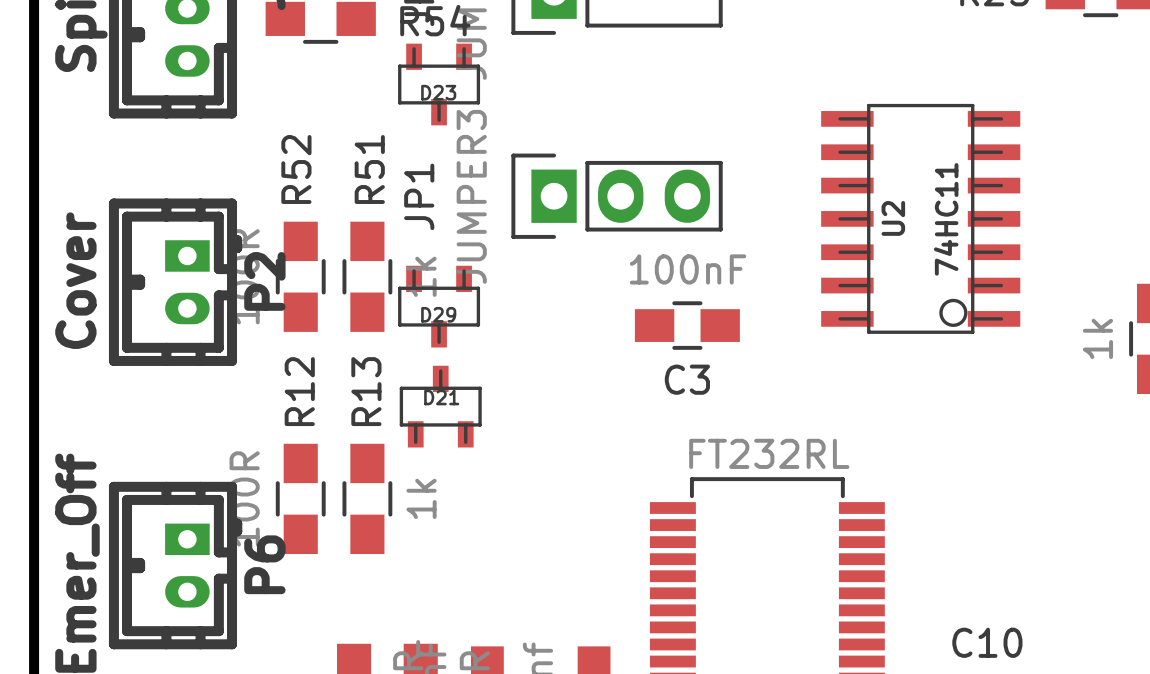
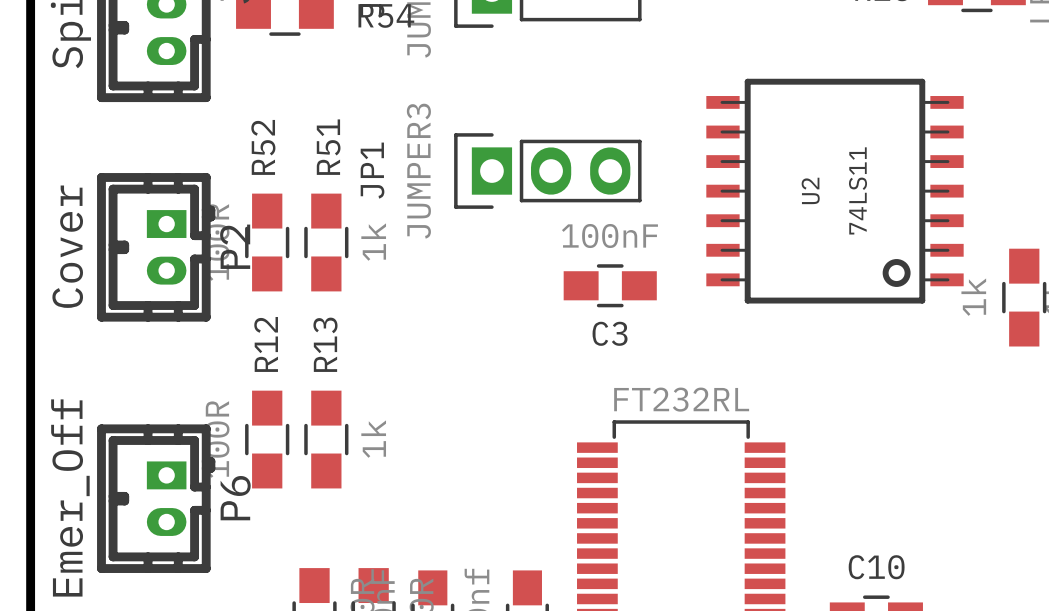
D23: (439, 84) -> none
U2 footprint: [821, 103, 1021, 334] -> [706, 78, 964, 304]
U2 value: 74HC11 (946, 219) -> 74LS11 (857, 190)
D29: (439, 306) -> none
D21: (440, 406) -> none

